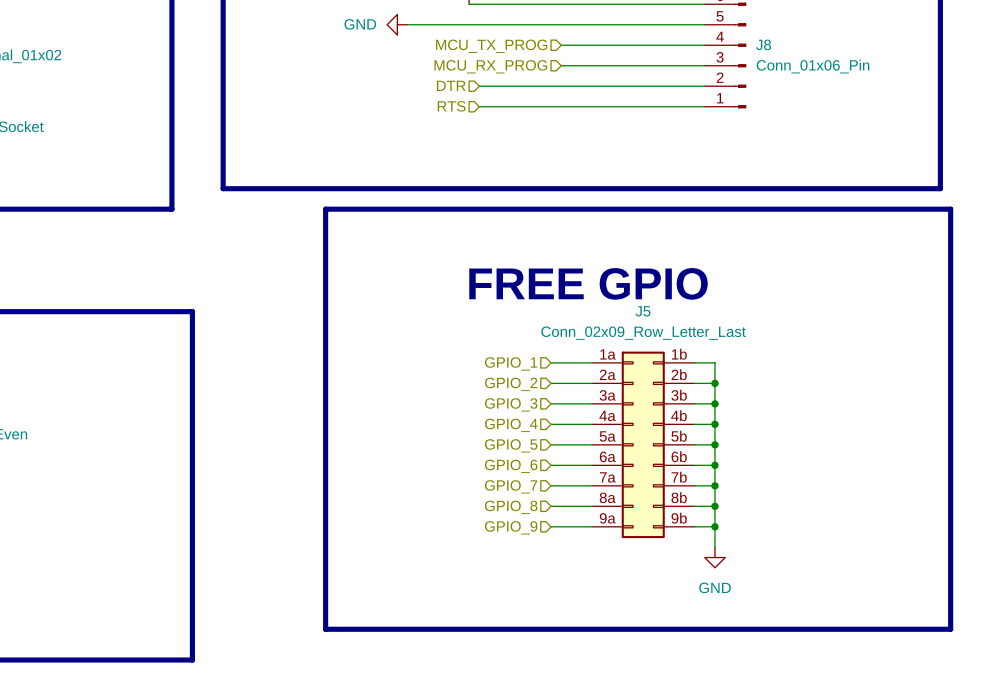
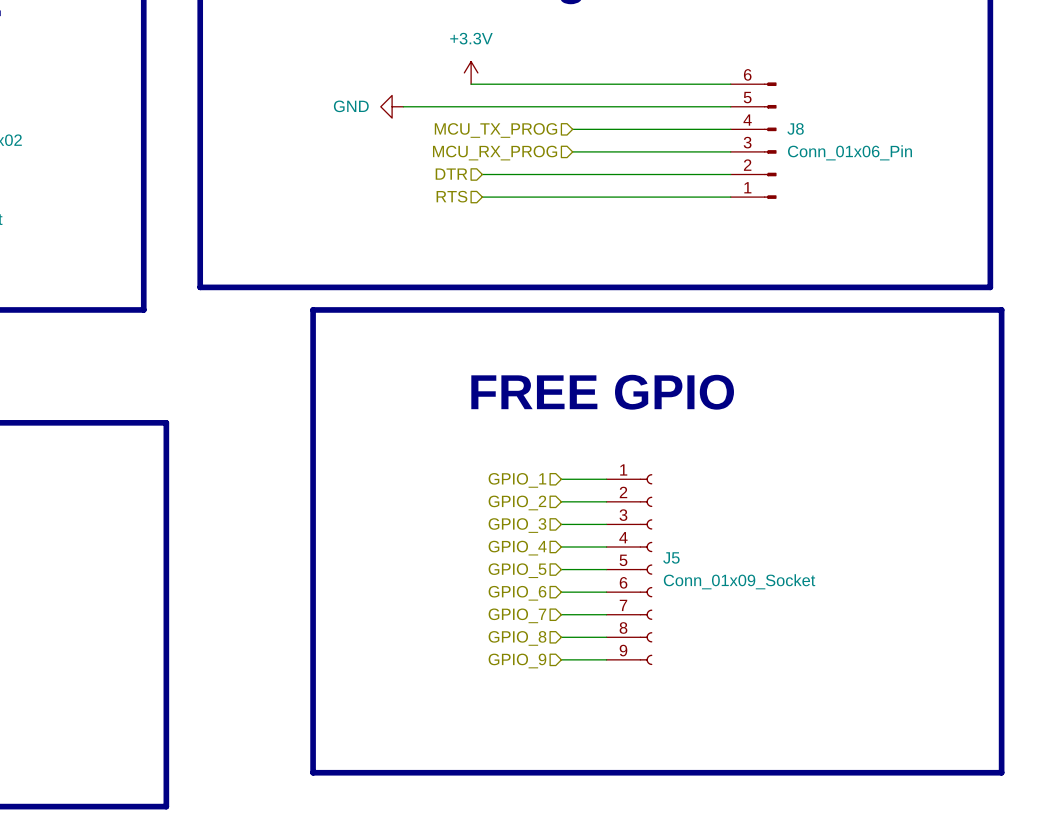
J5 name position: J5 (643, 311) -> J5 (671, 557)
J5 value: Conn_02x09_Row_Letter_Last (643, 333) -> Conn_01x09_Socket (739, 581)
J5 symbol: [592, 351, 695, 539] -> [606, 474, 653, 666]
wire: (694, 362) (714, 362) (714, 547) -> none
wire: (694, 383) (714, 383) -> none
junction: (714, 383) -> none
wire: (694, 403) (714, 403) -> none
junction: (714, 403) -> none
wire: (694, 424) (714, 424) -> none
junction: (714, 424) -> none
wire: (694, 444) (714, 444) -> none
junction: (714, 444) -> none
wire: (694, 465) (714, 465) -> none
junction: (714, 465) -> none
wire: (694, 485) (714, 485) -> none
junction: (714, 485) -> none
wire: (694, 506) (714, 506) -> none
junction: (714, 506) -> none
wire: (694, 526) (714, 526) -> none
junction: (714, 526) -> none
power symbol: GND (714, 557) -> none

